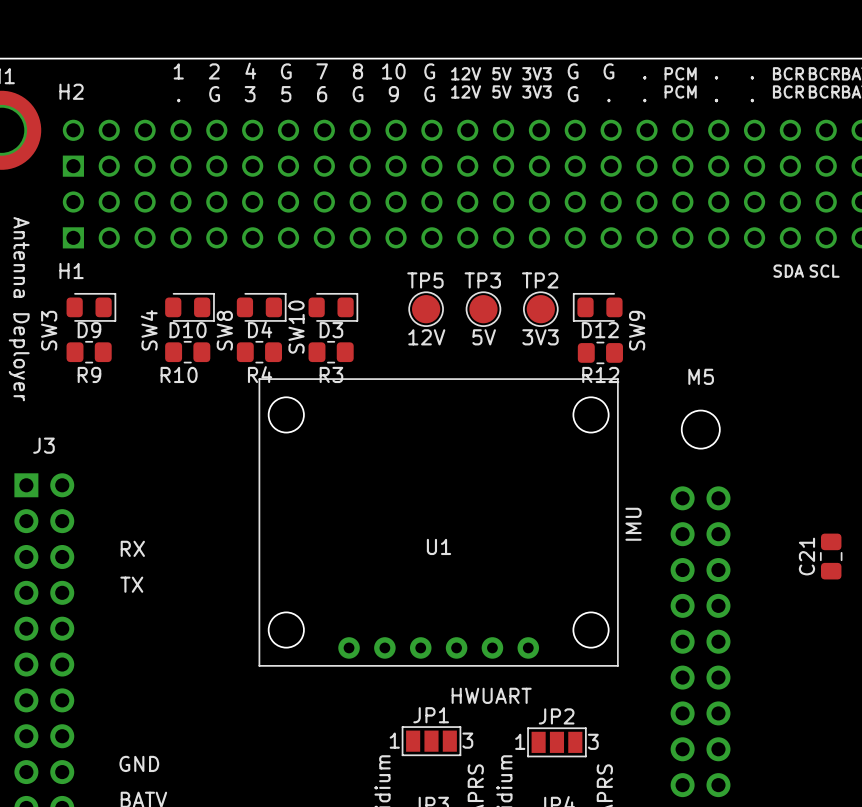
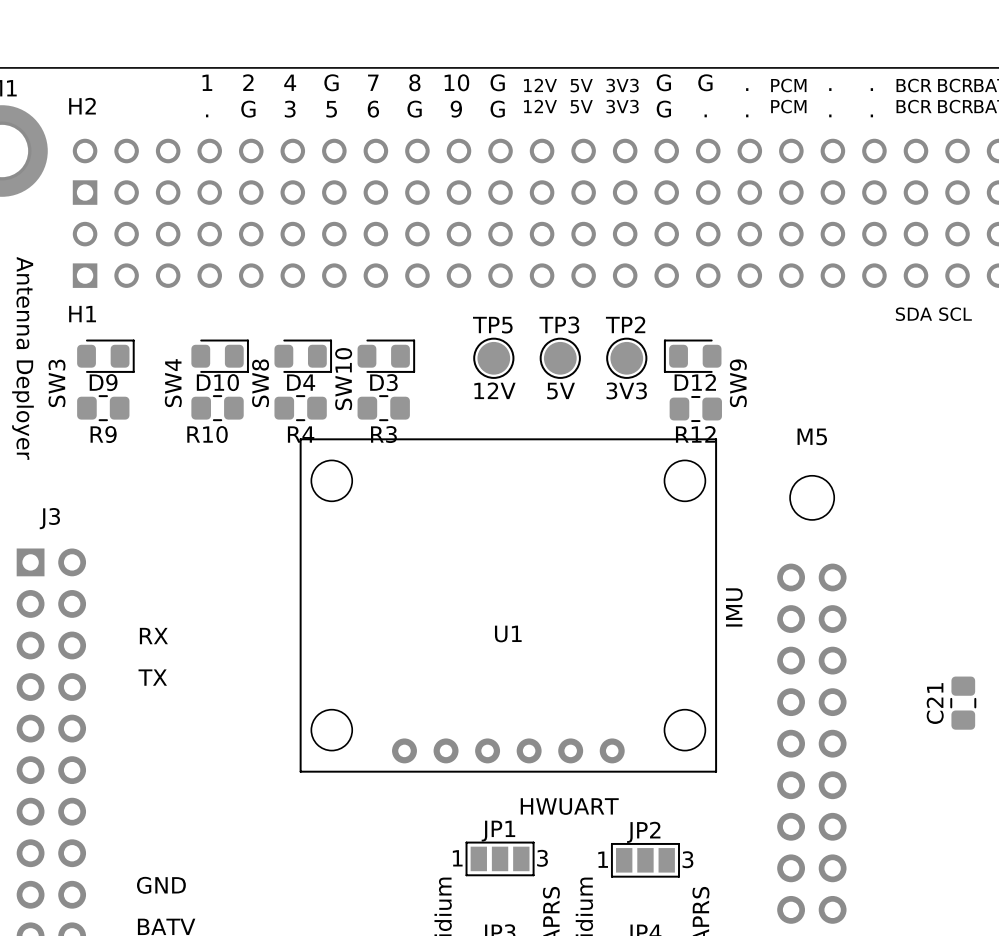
C21 position: (831, 556) -> (963, 703)

